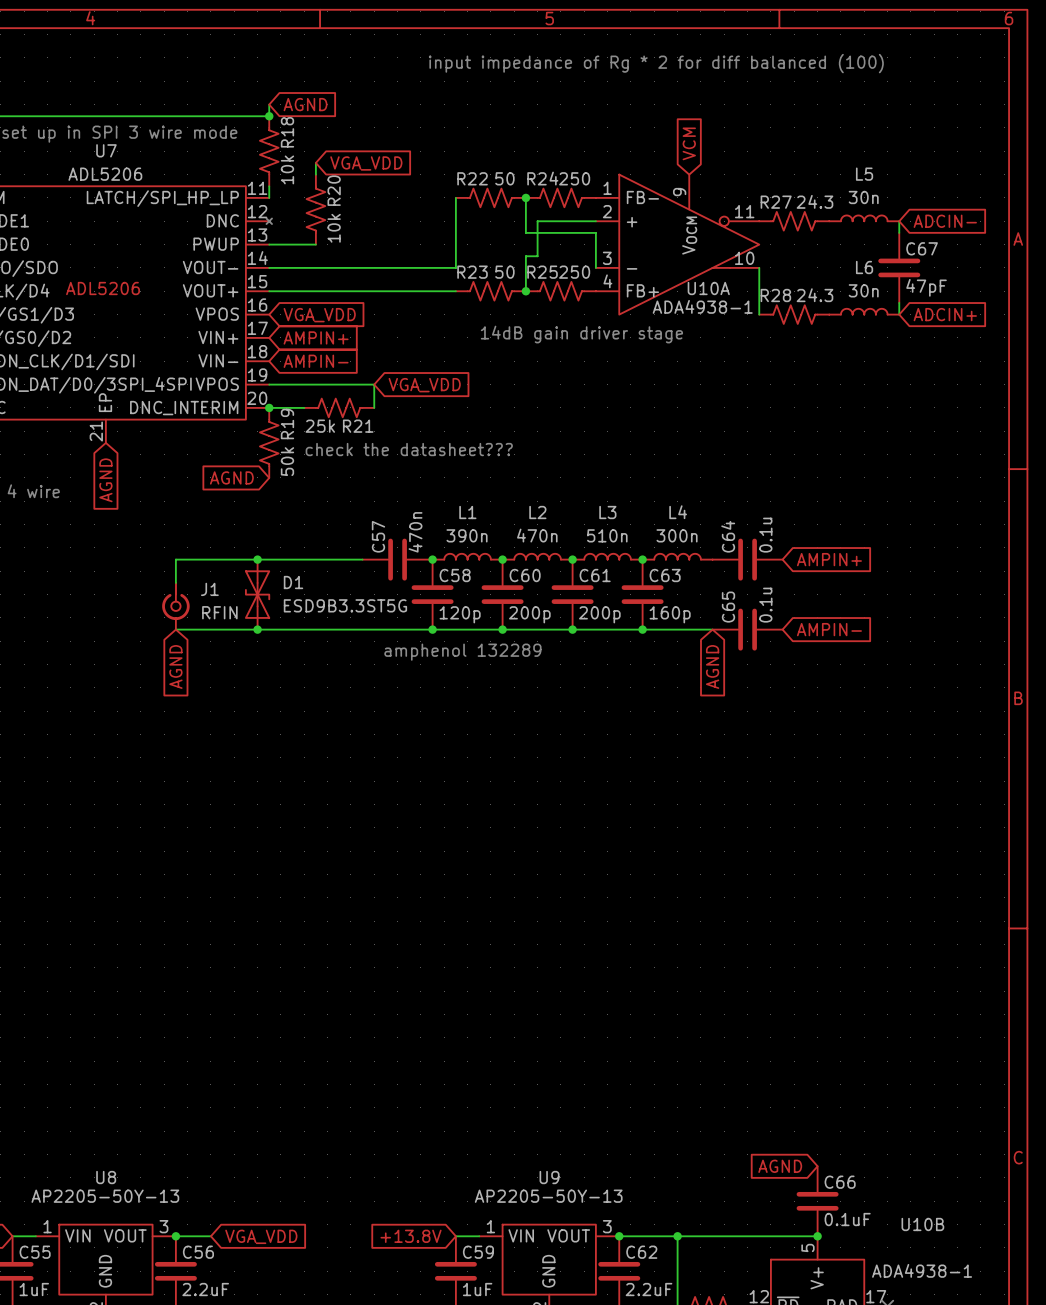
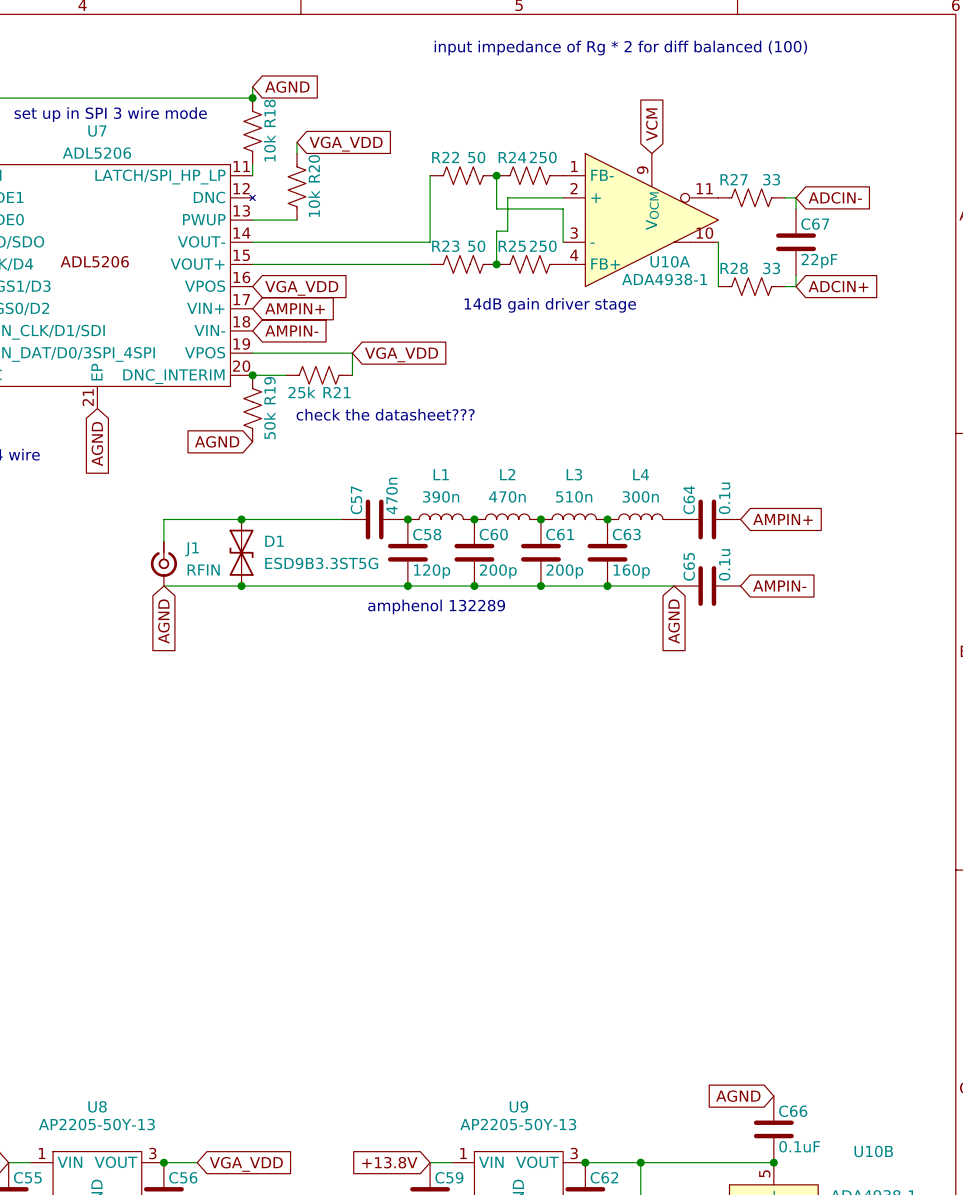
R27 value: 24.3 (814, 201) -> 33 (771, 179)
L5: 30n (864, 218) -> none
wire: (899, 221) (899, 232) -> none
global label position: ADCIN- (945, 221) -> ADCIN- (835, 197)
C67 position: (899, 267) -> (796, 242)
C67 value: 47pF (926, 287) -> 22pF (819, 261)
R28 value: 24.3 (814, 295) -> 33 (771, 268)
wire: (899, 302) (899, 314) -> none
L6: 30n (864, 311) -> none
global label position: ADCIN+ (945, 314) -> ADCIN+ (838, 286)

